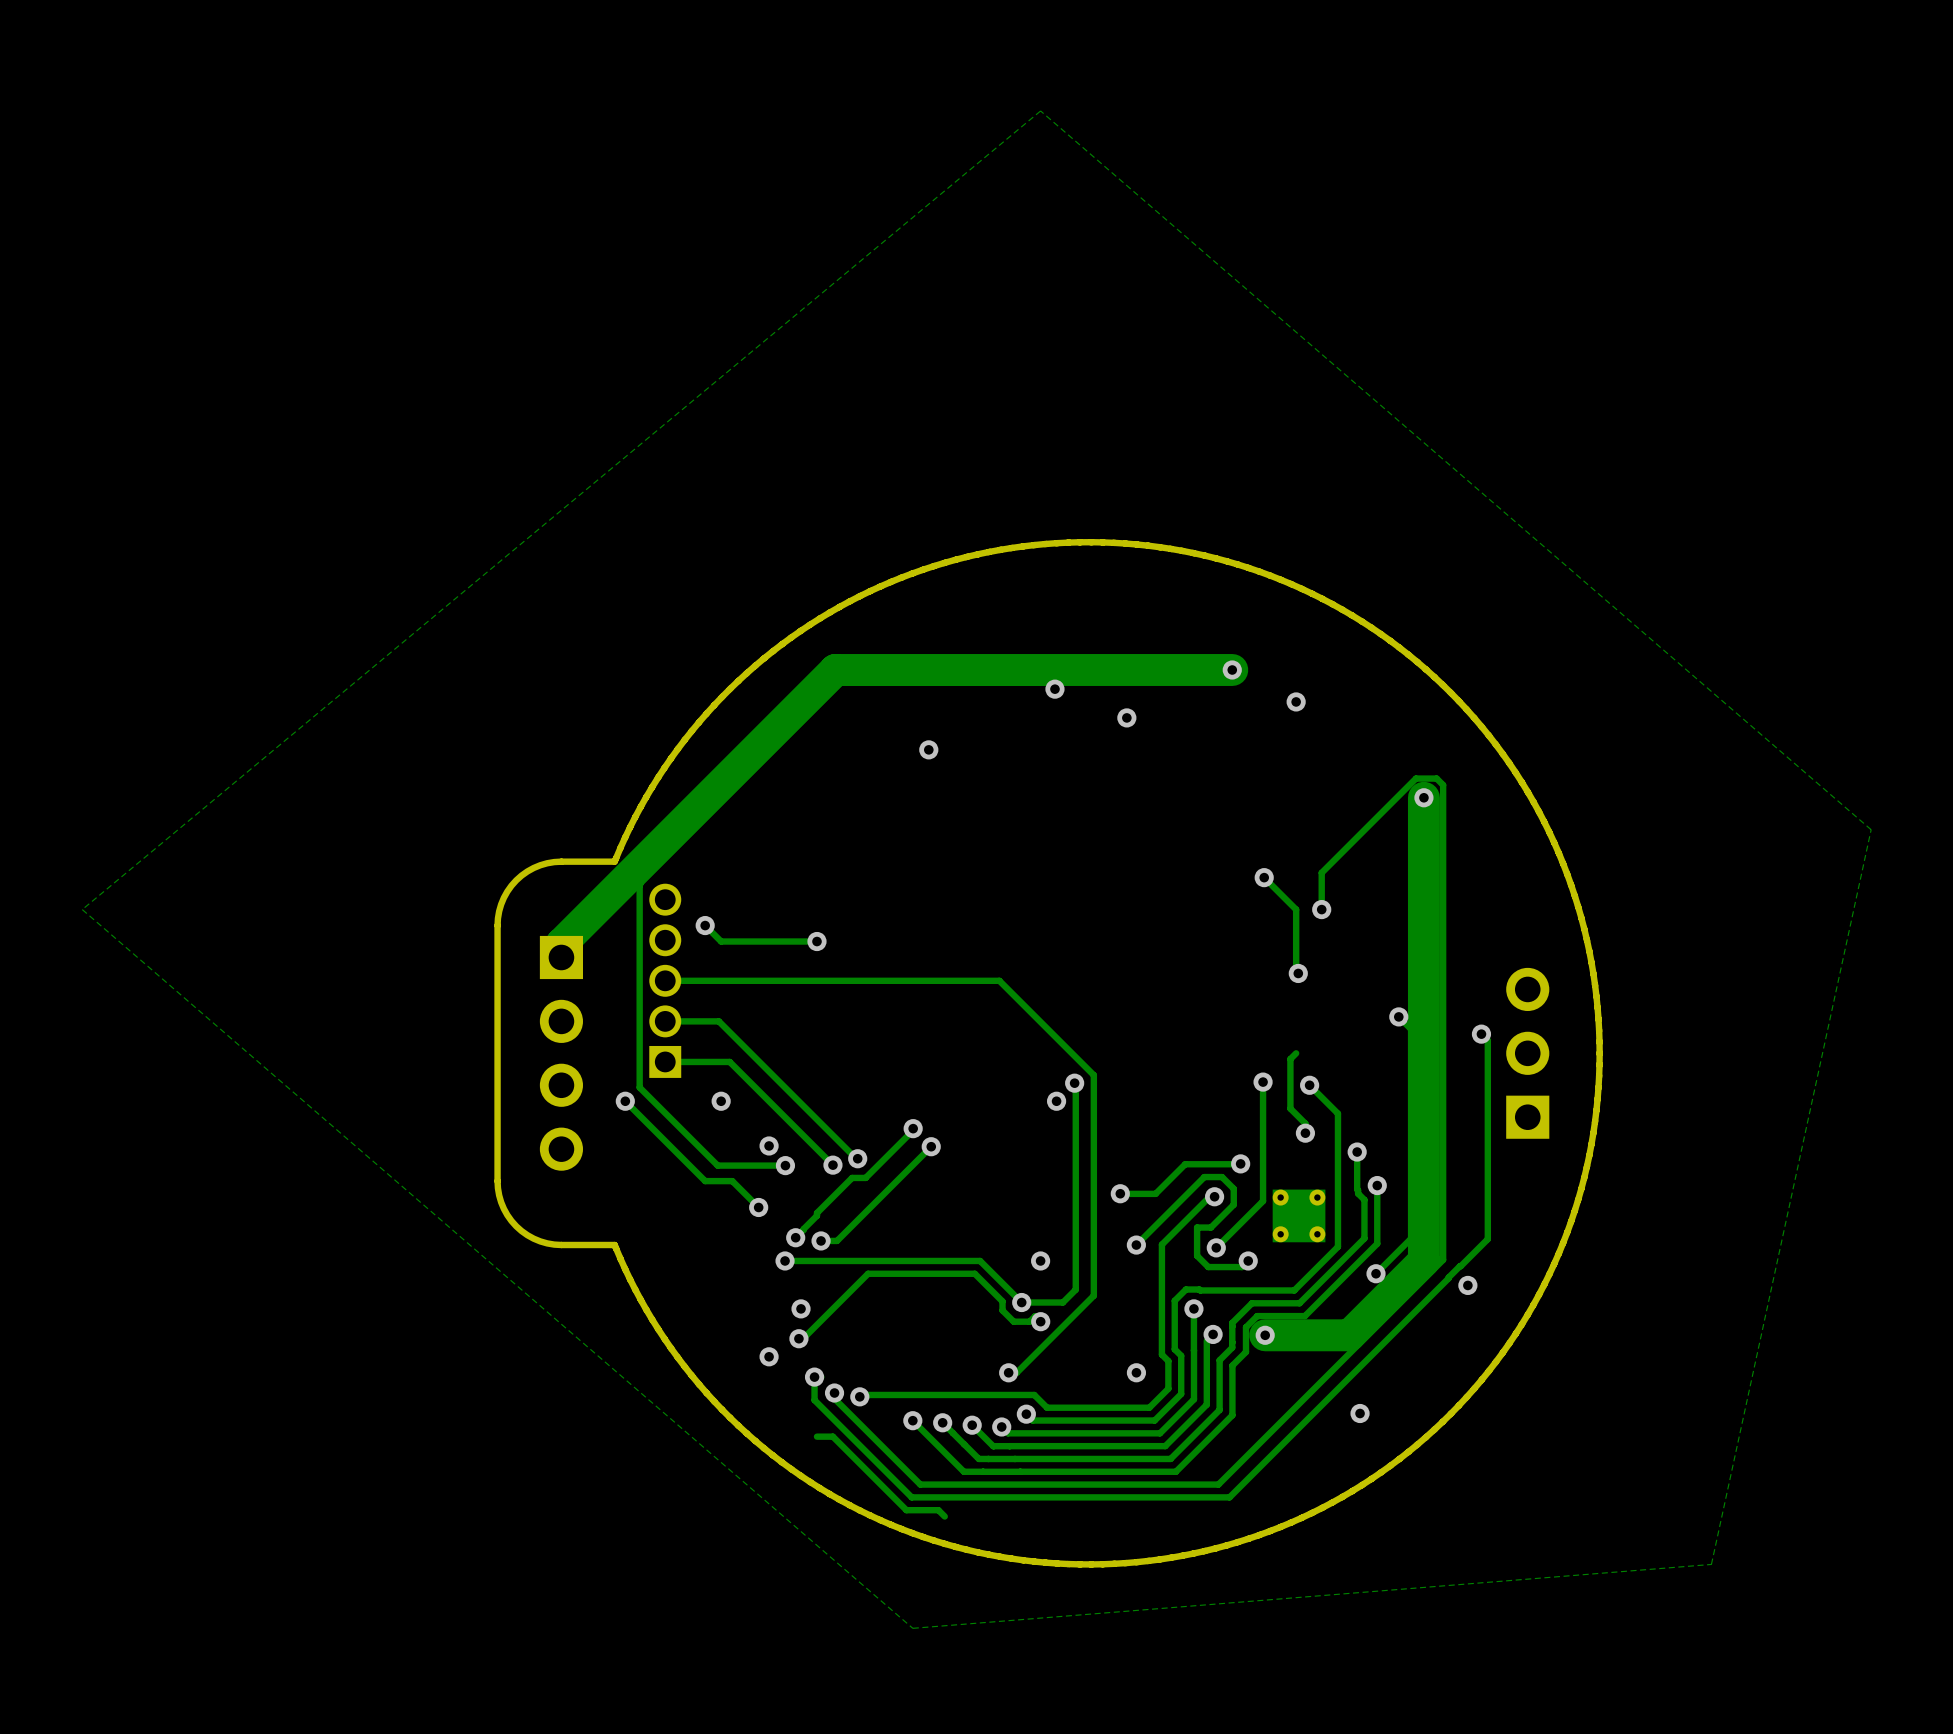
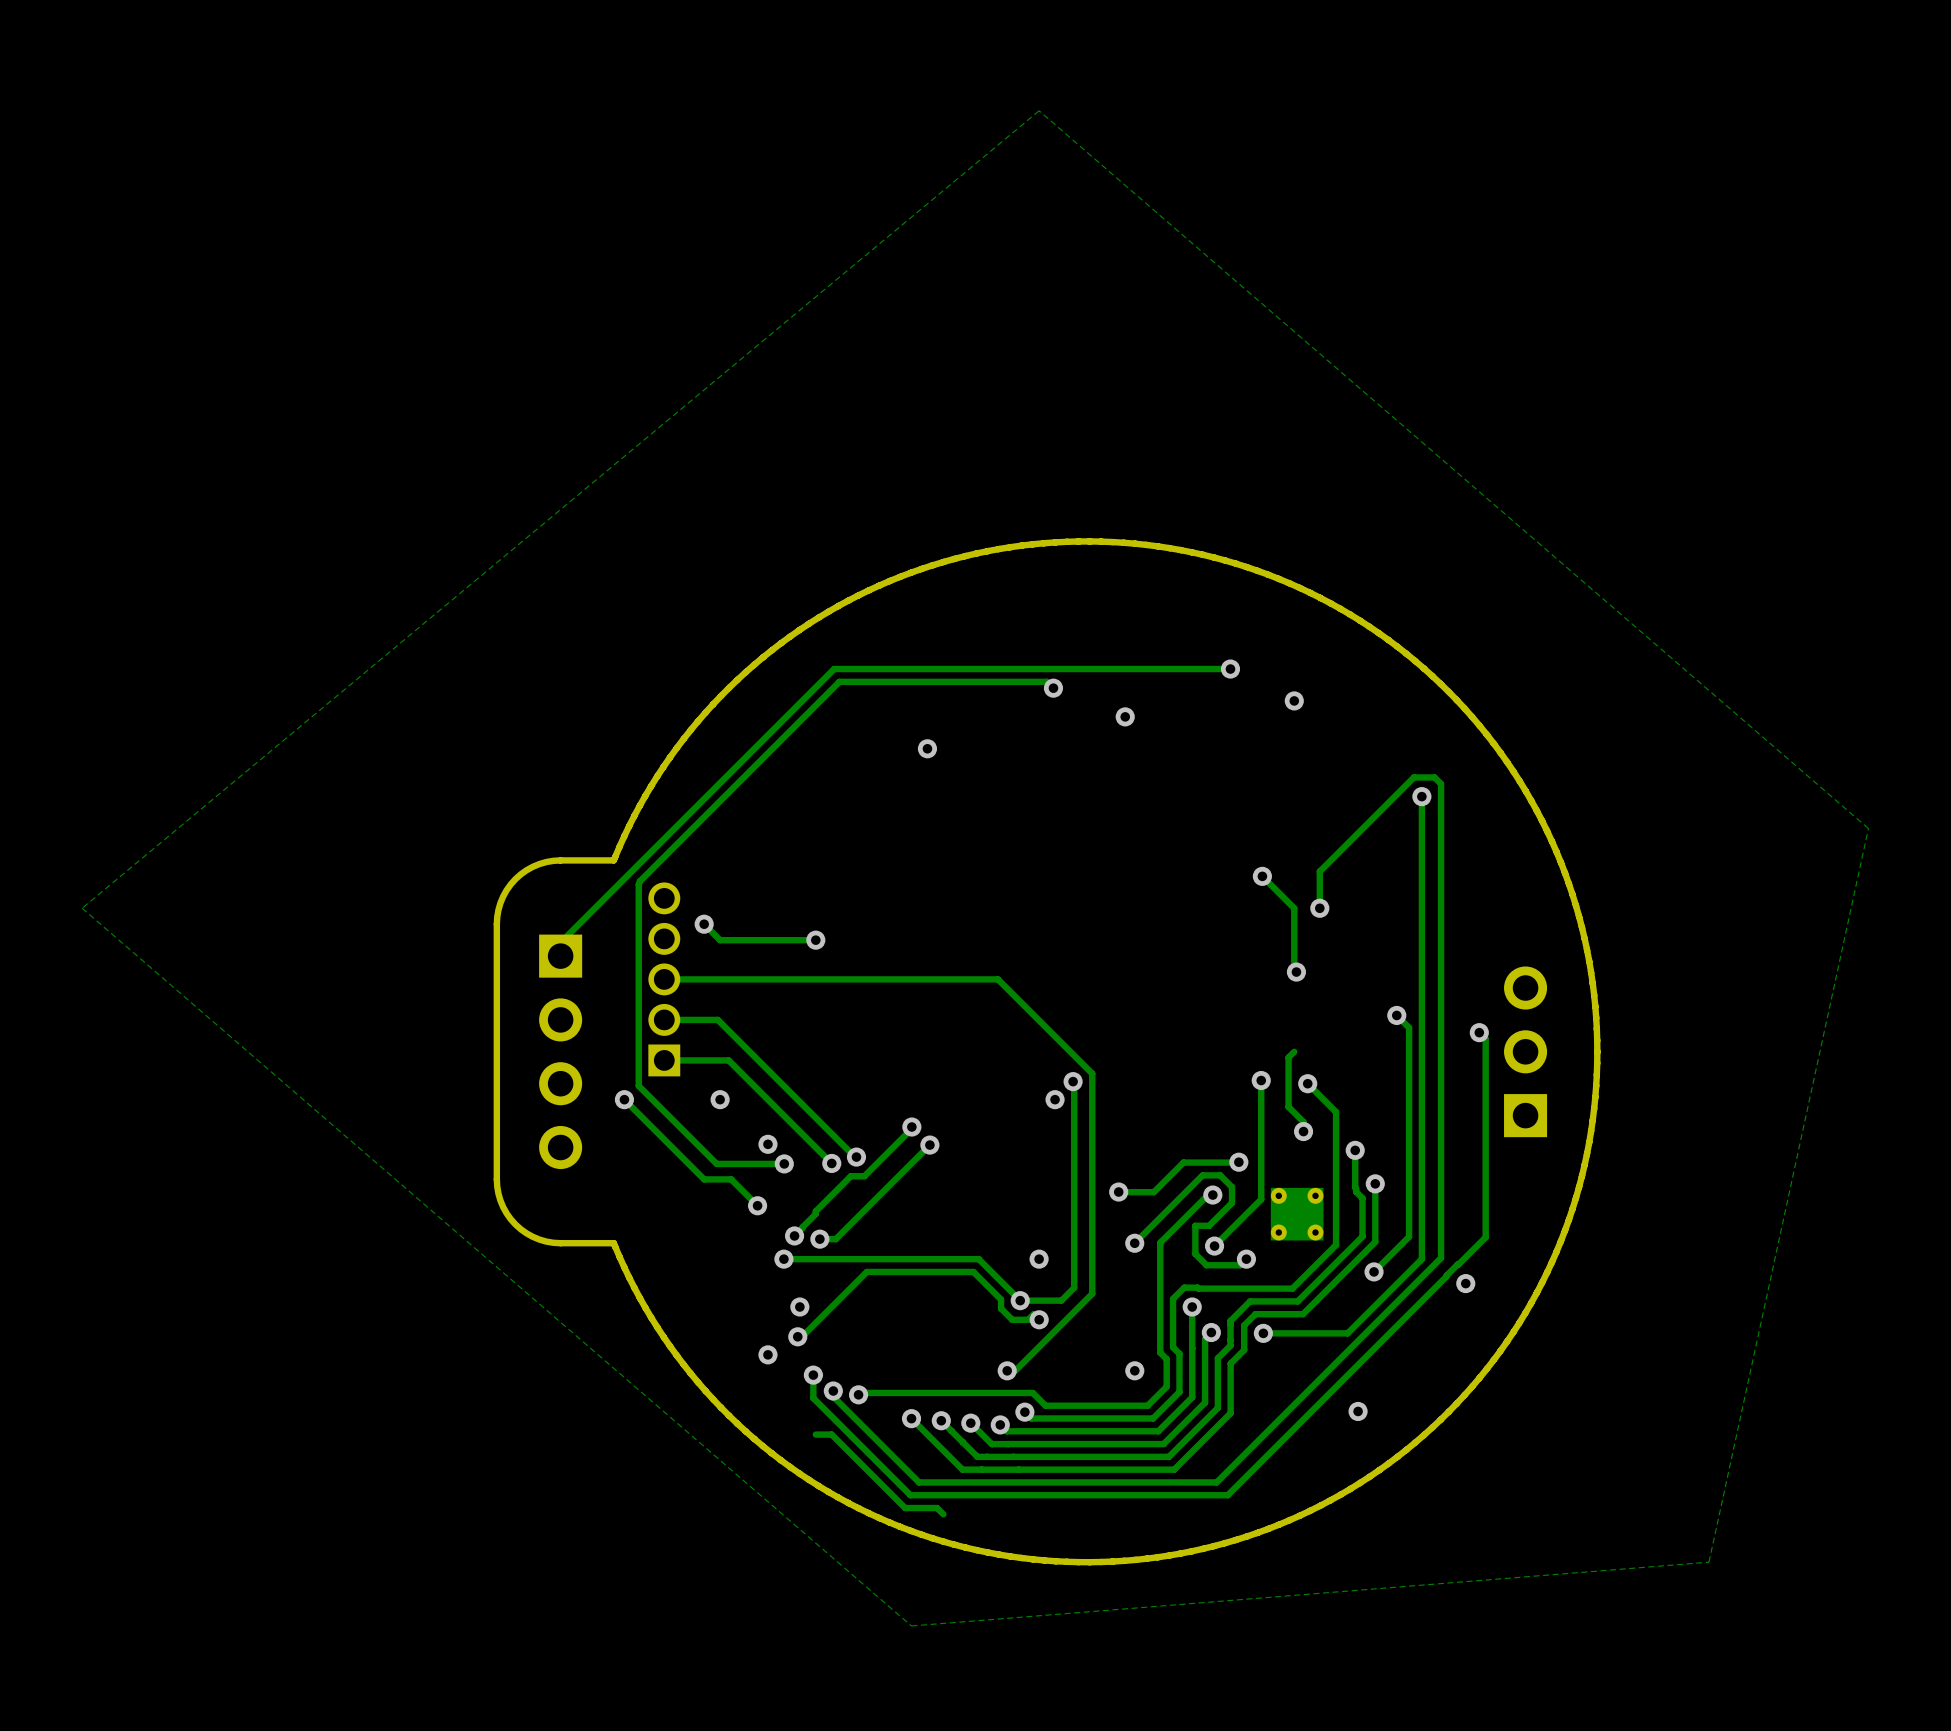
track width: thick (1232, 670) (835, 670) (561, 943) (561, 957) -> thin (1230, 669) (834, 669) (560, 942) (560, 956)
track width: thick (1423, 797) (1423, 1260) (1349, 1335) (1265, 1335) -> thin (1421, 796) (1421, 1259) (1347, 1333) (1263, 1333)

